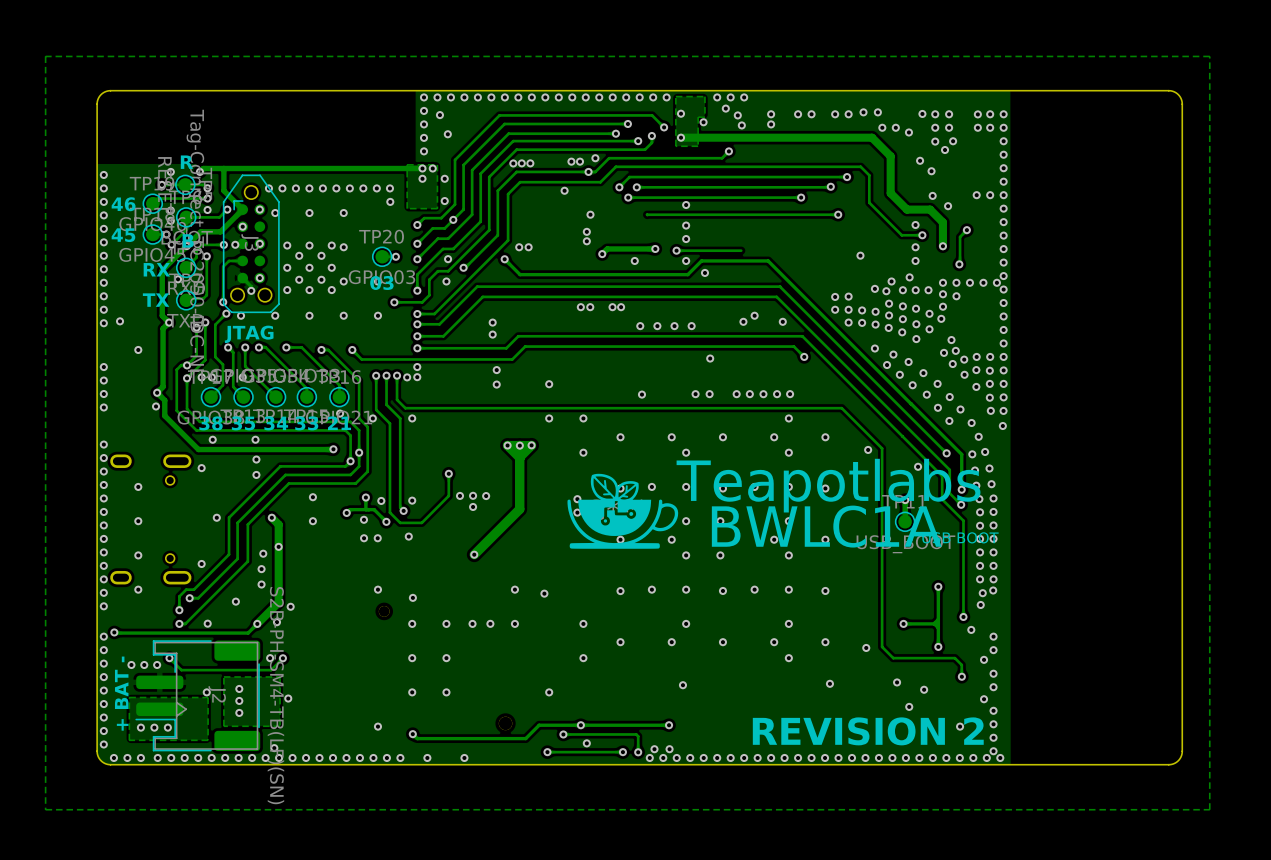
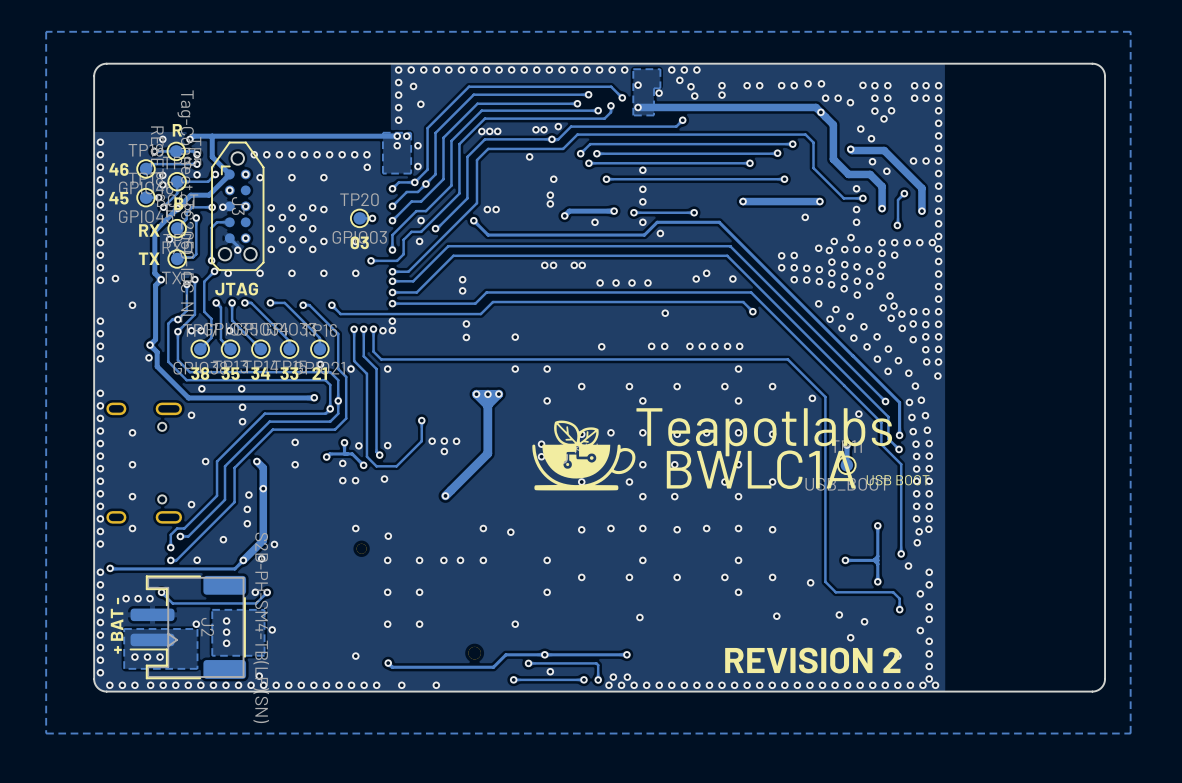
via: none -> (820, 112)
track: none -> (850, 149) (884, 150) (921, 188) (921, 211)
via: none -> (850, 149)
via: none -> (606, 179)
via: none -> (414, 182)
via: none -> (743, 201)
track: none -> (819, 201) (743, 201)
via: none -> (819, 201)
via: none -> (921, 211)
via: none -> (694, 212)

